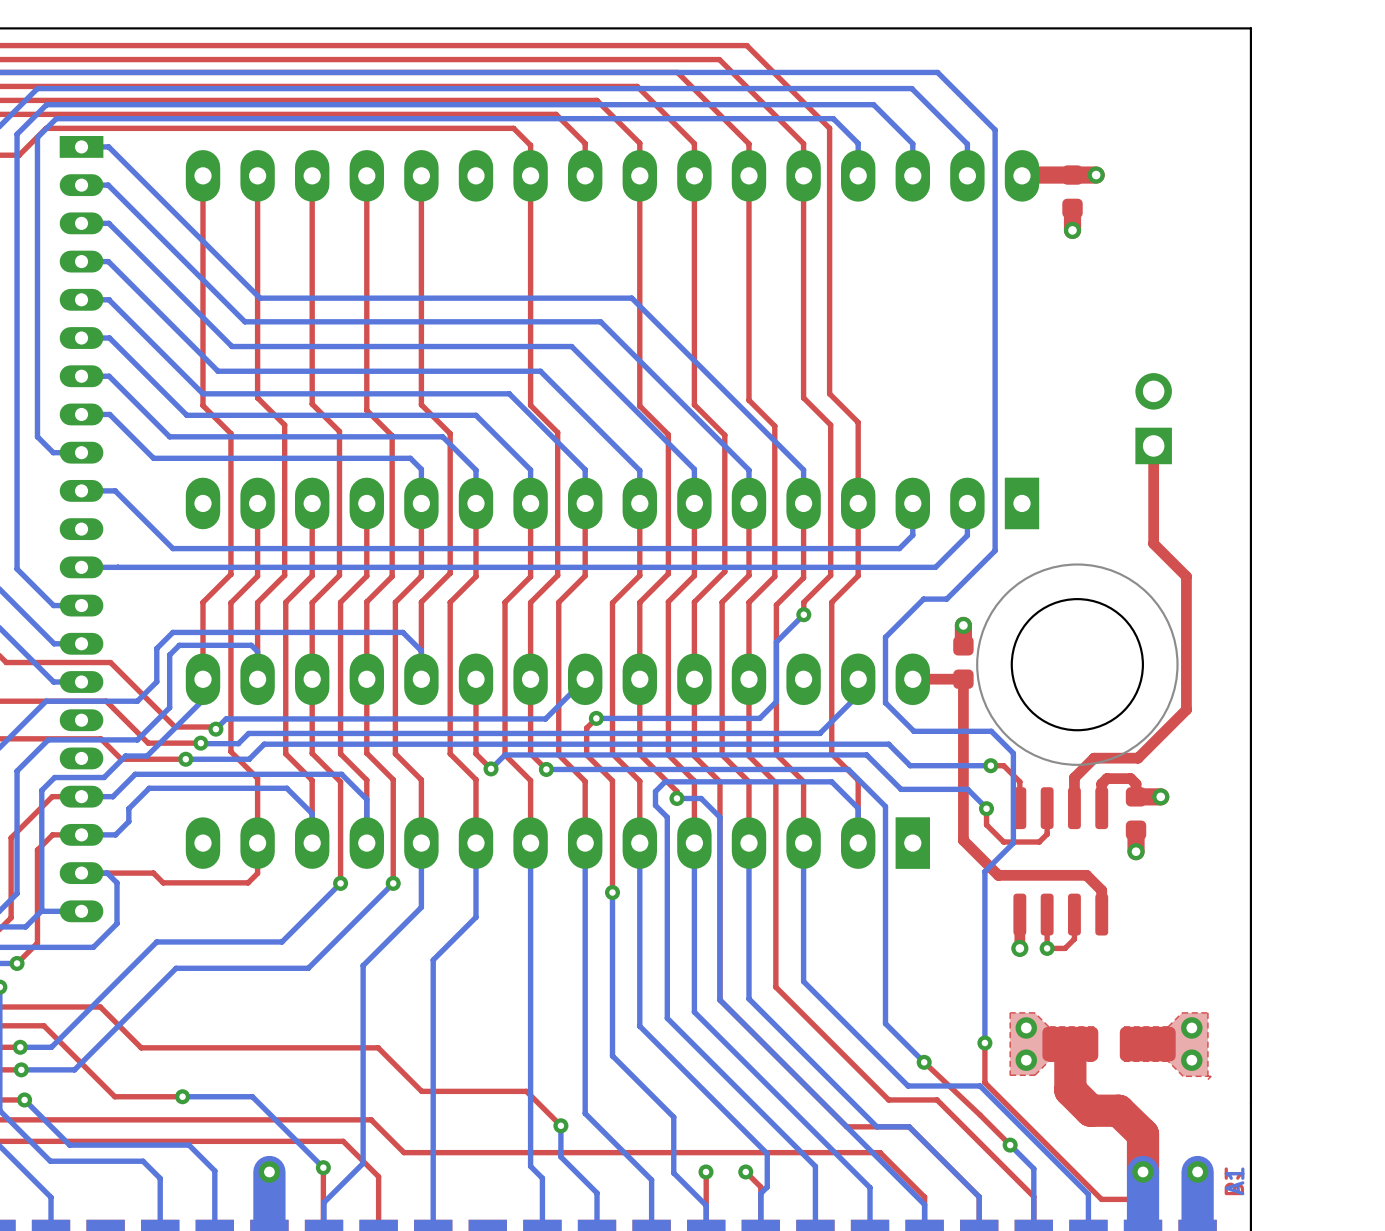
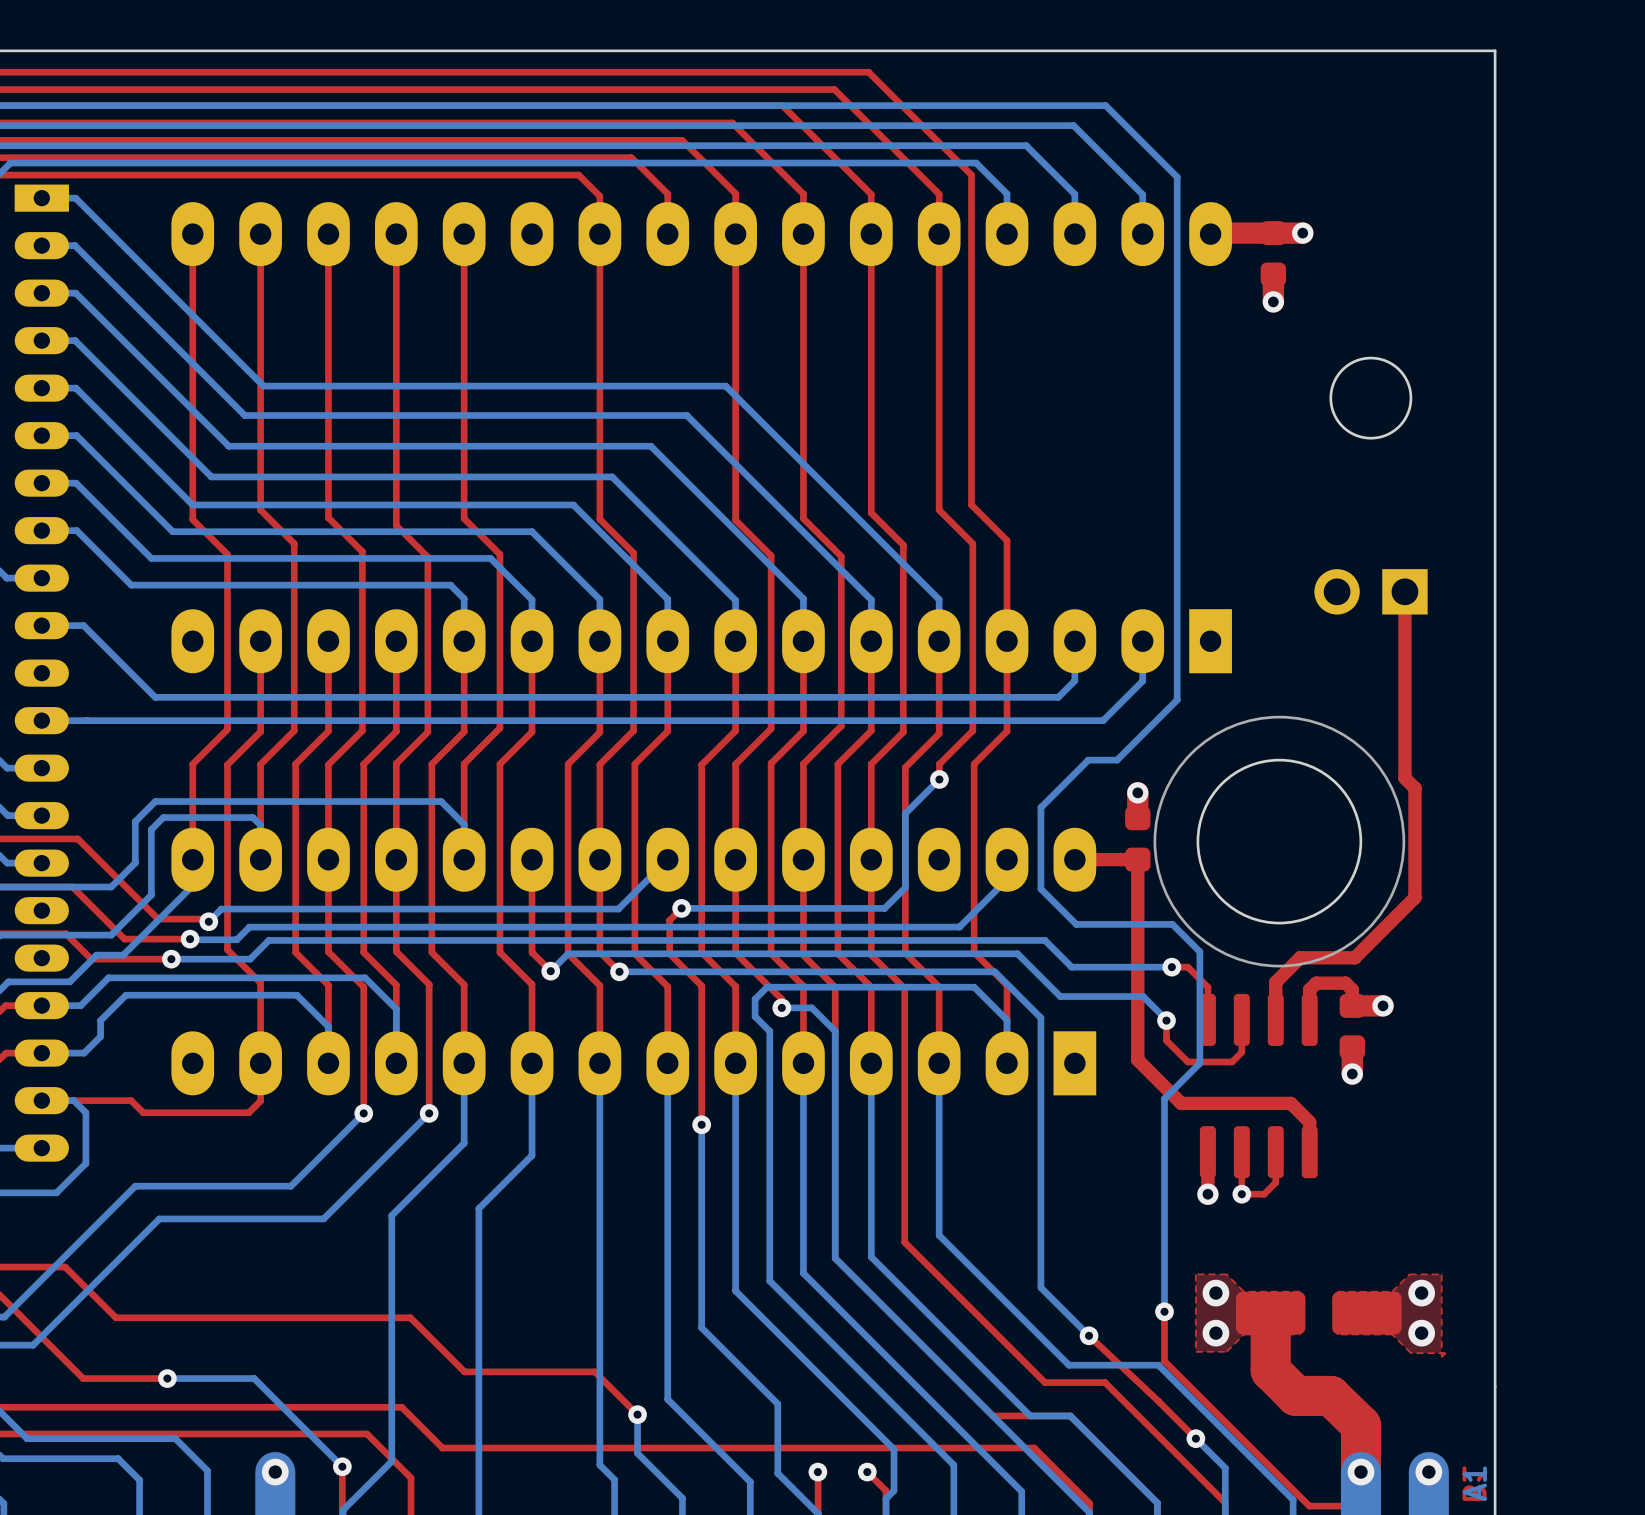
round board edge: none -> [1329, 356, 1413, 440]
part rotation: 0° (1153, 418) -> 90° counterclockwise (1371, 591)
top track: (1153, 445) (1153, 543) (1186, 576) (1186, 621) -> (1404, 591) (1404, 778) (1414, 788)

